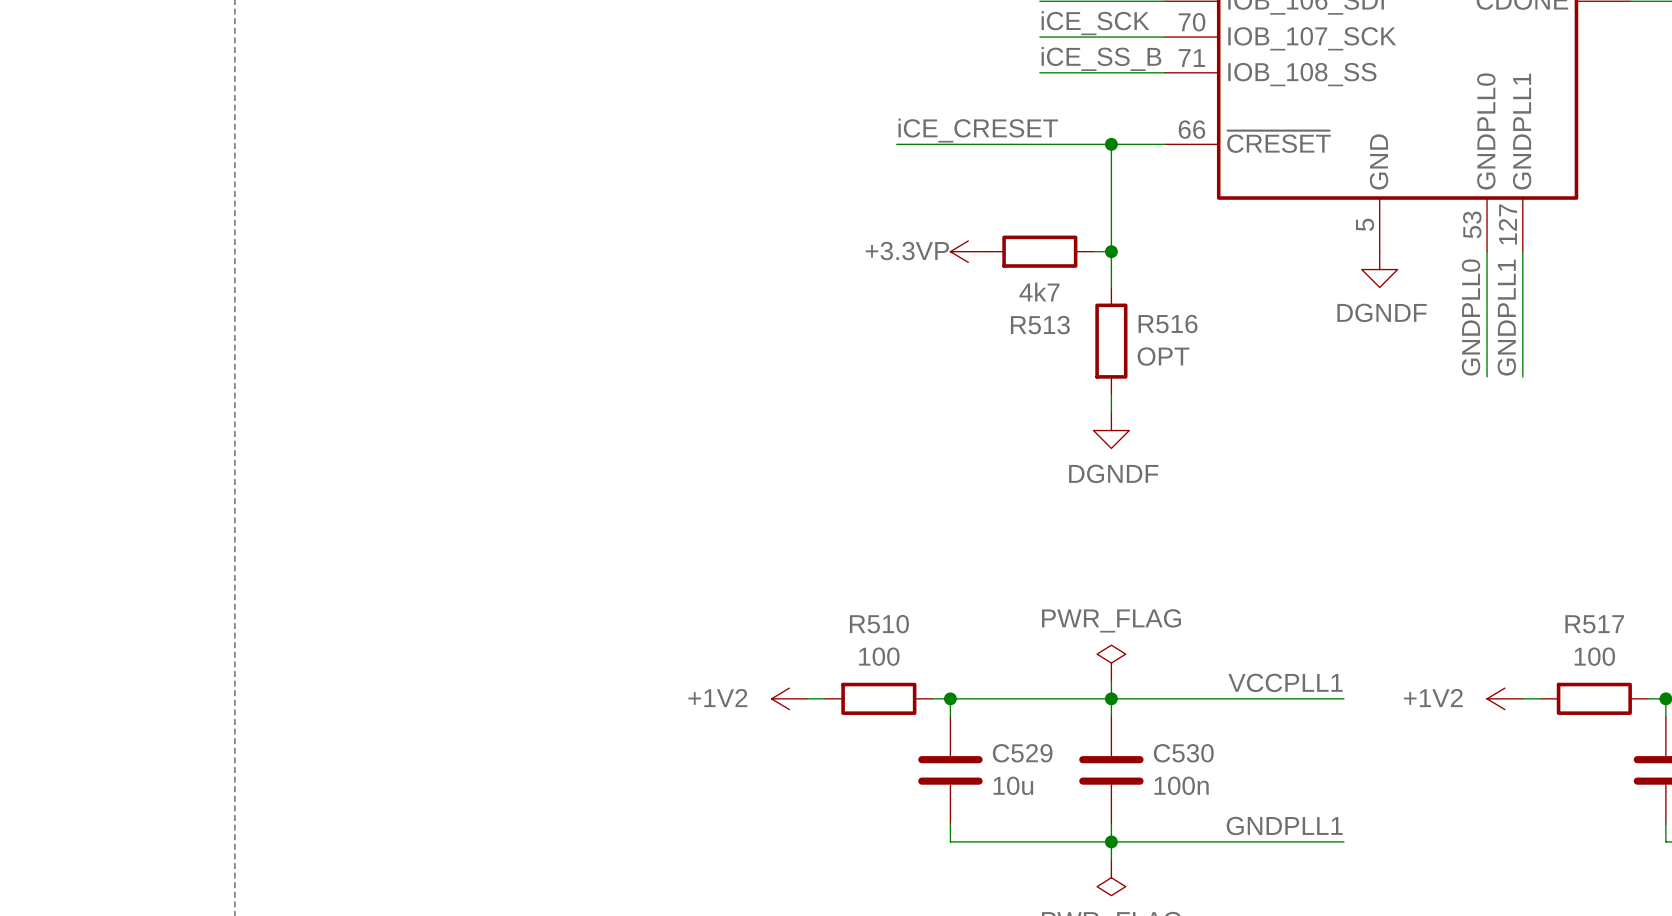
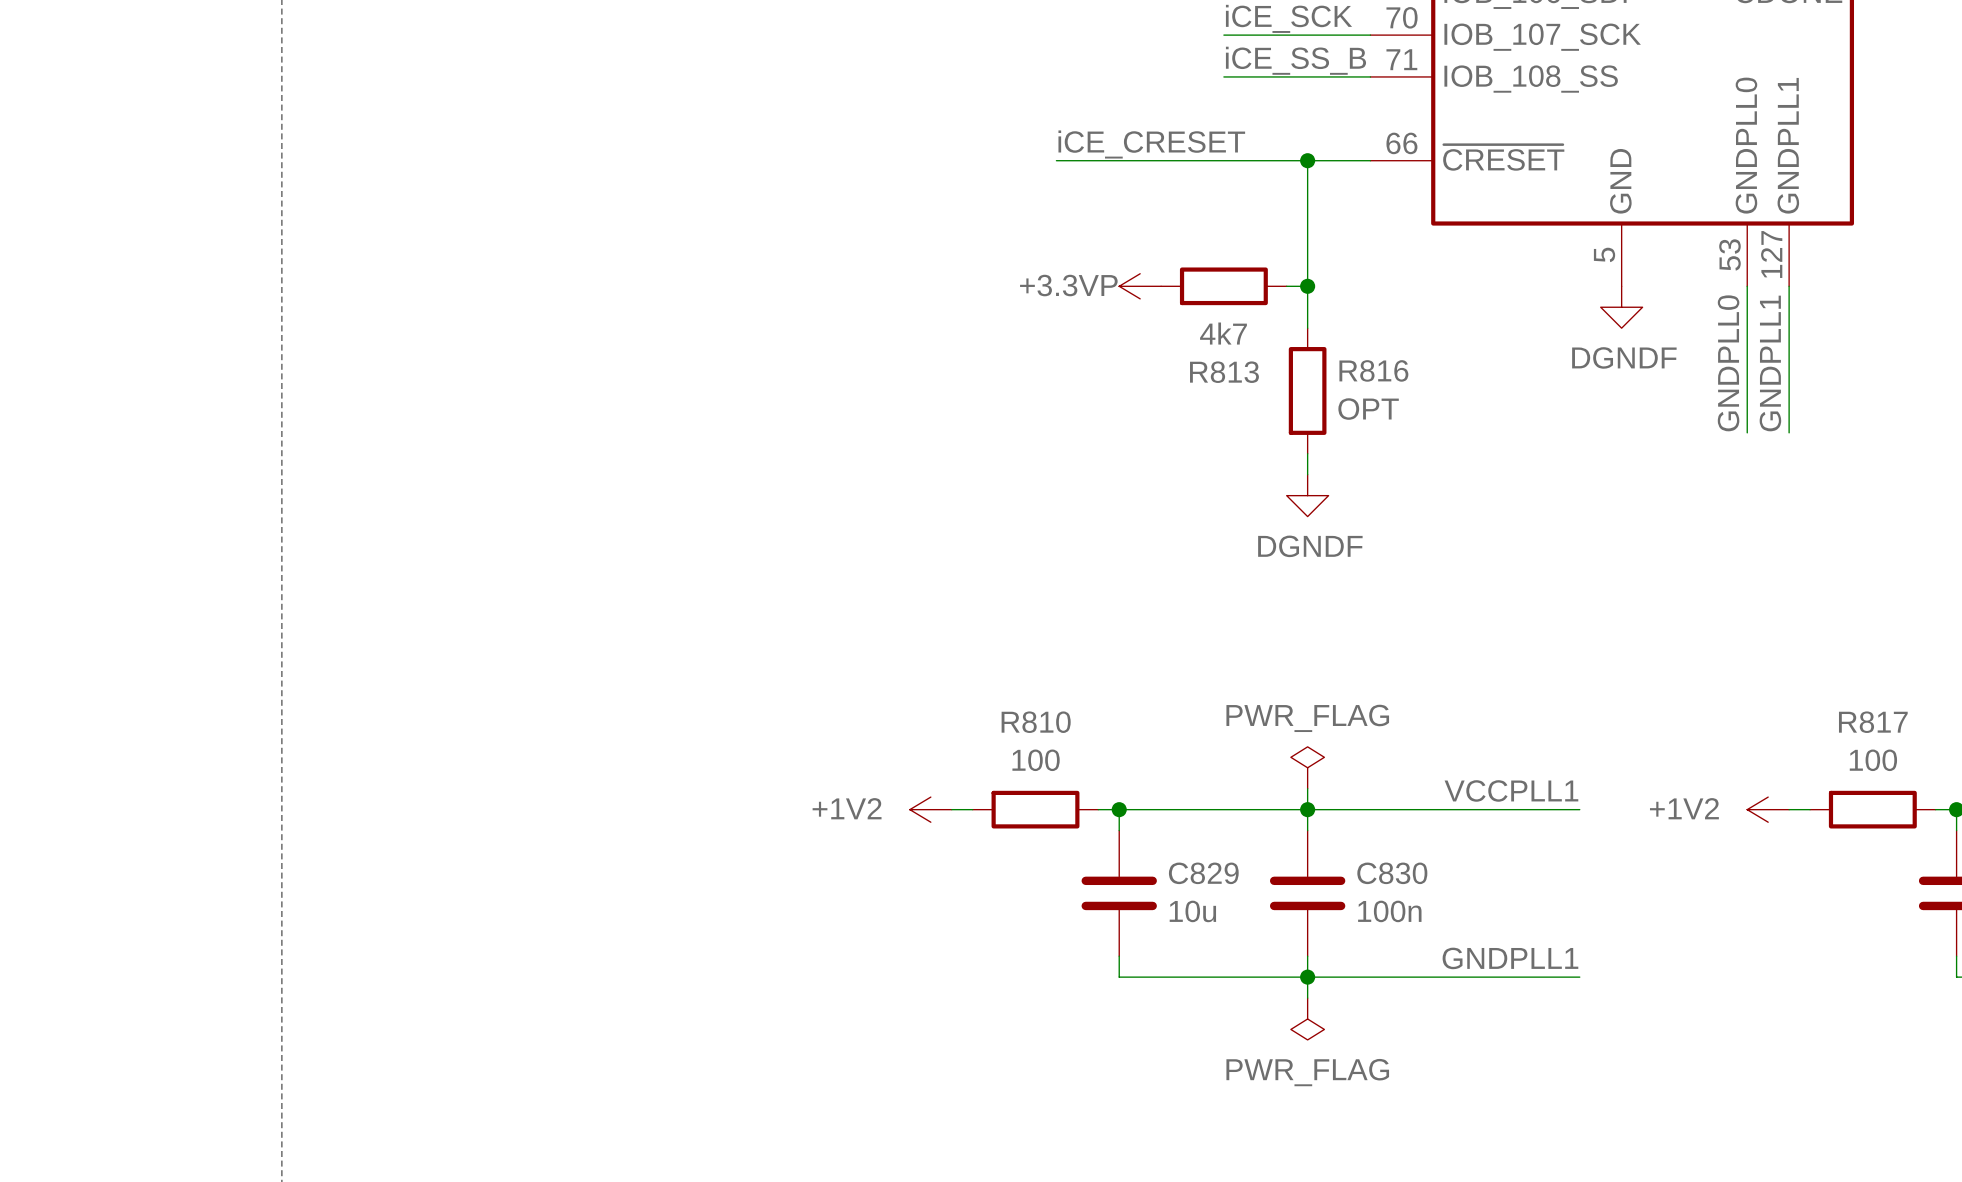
R516 name: R516 (1168, 323) -> R816 (1373, 370)
R513 name: R513 (1040, 325) -> R813 (1224, 372)
R510 name: R510 (879, 624) -> R810 (1036, 722)
R517 name: R517 (1594, 624) -> R817 (1873, 722)
C529 name: C529 (1022, 753) -> C829 (1203, 873)
C530 name: C530 (1183, 753) -> C830 (1392, 873)

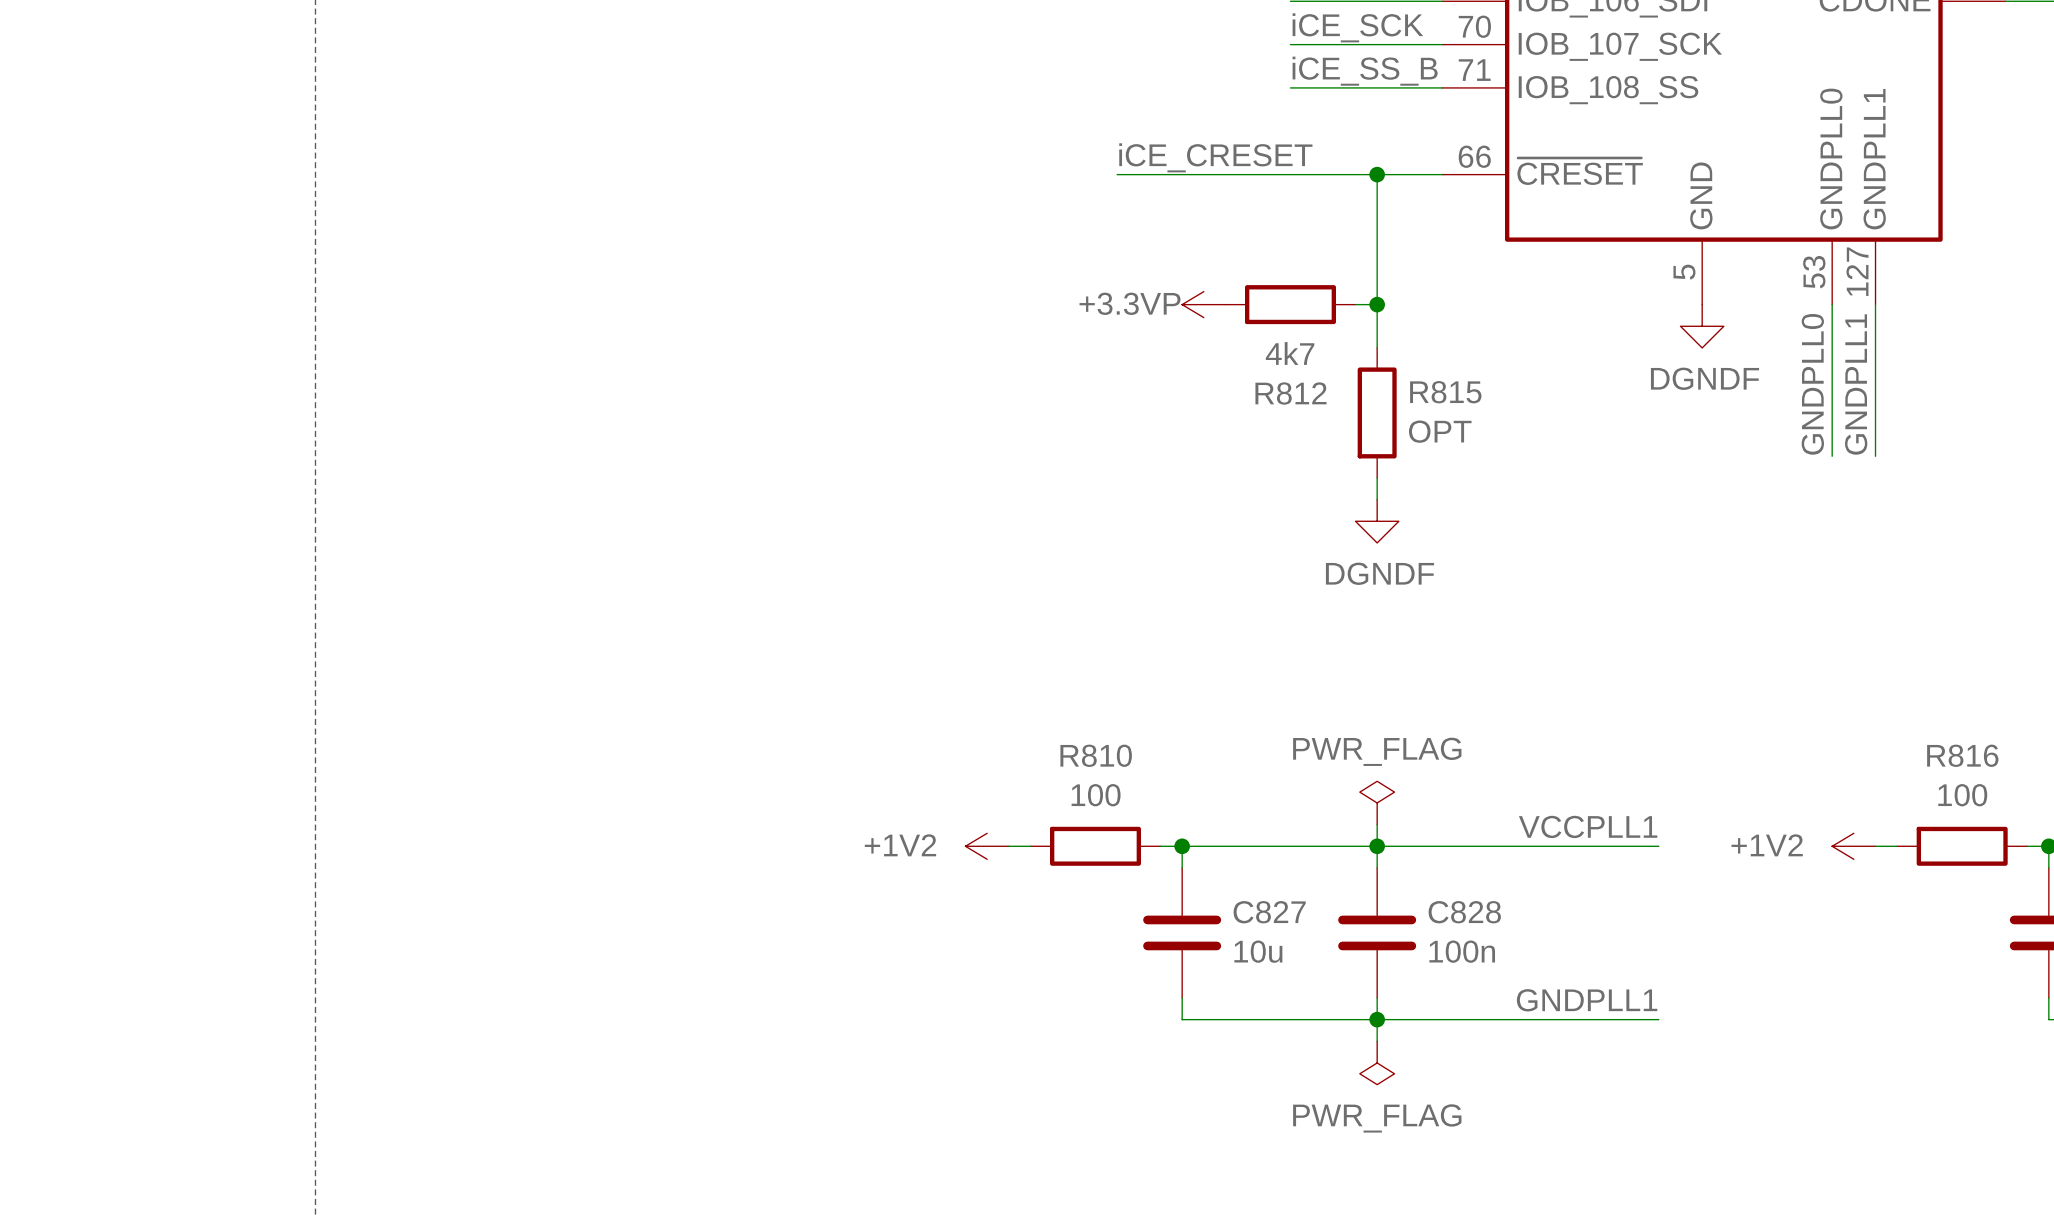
R816 name: R816 (1373, 370) -> R815 (1445, 392)
R813 name: R813 (1224, 372) -> R812 (1291, 393)
R817 name: R817 (1873, 722) -> R816 (1962, 755)
C829 name: C829 (1203, 873) -> C827 (1269, 912)
C830 name: C830 (1392, 873) -> C828 (1464, 912)

